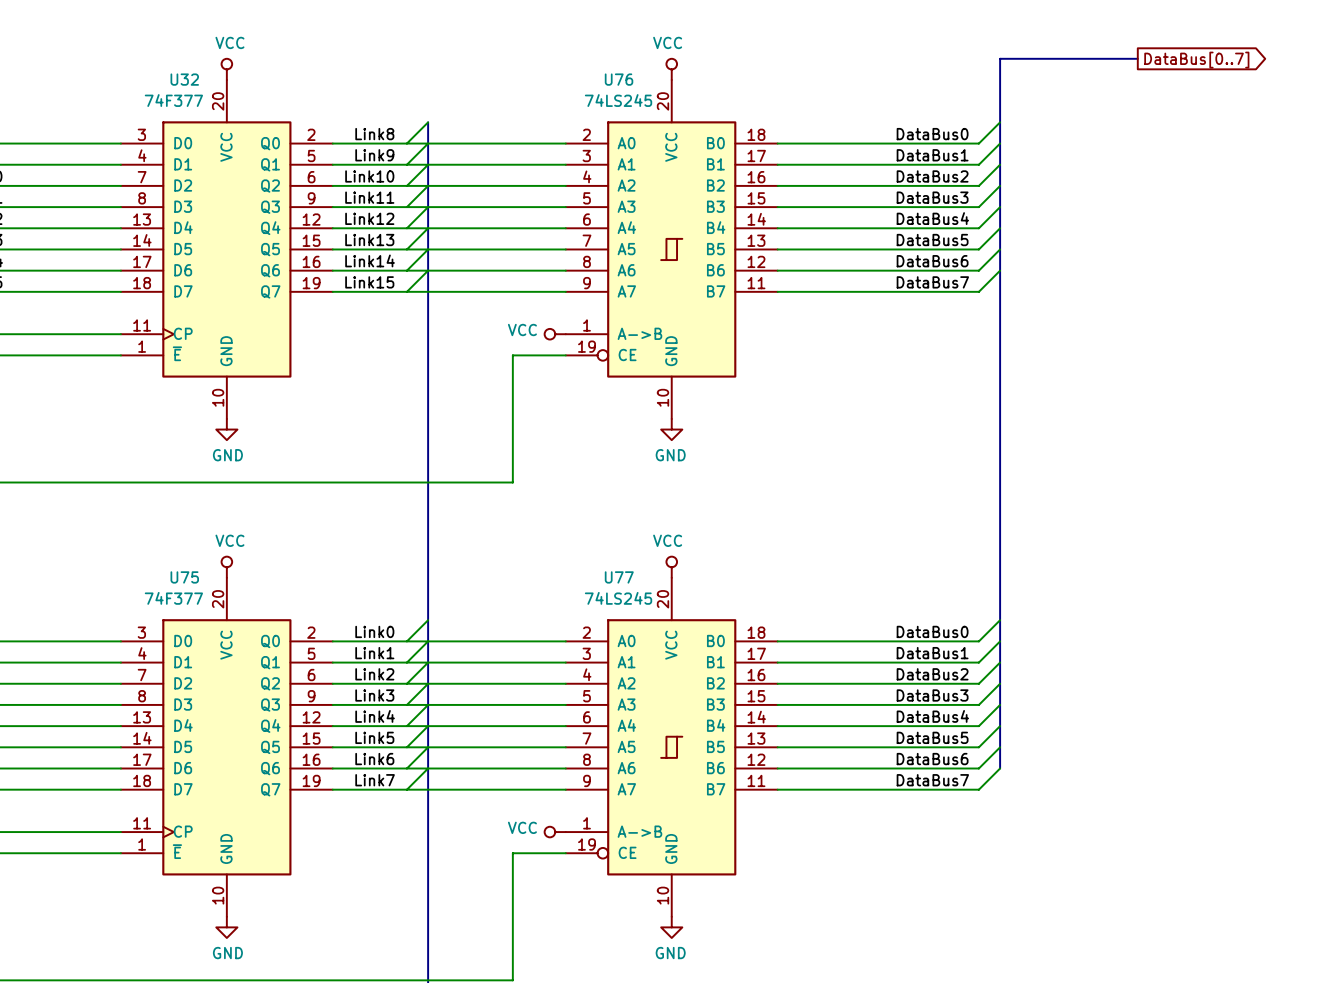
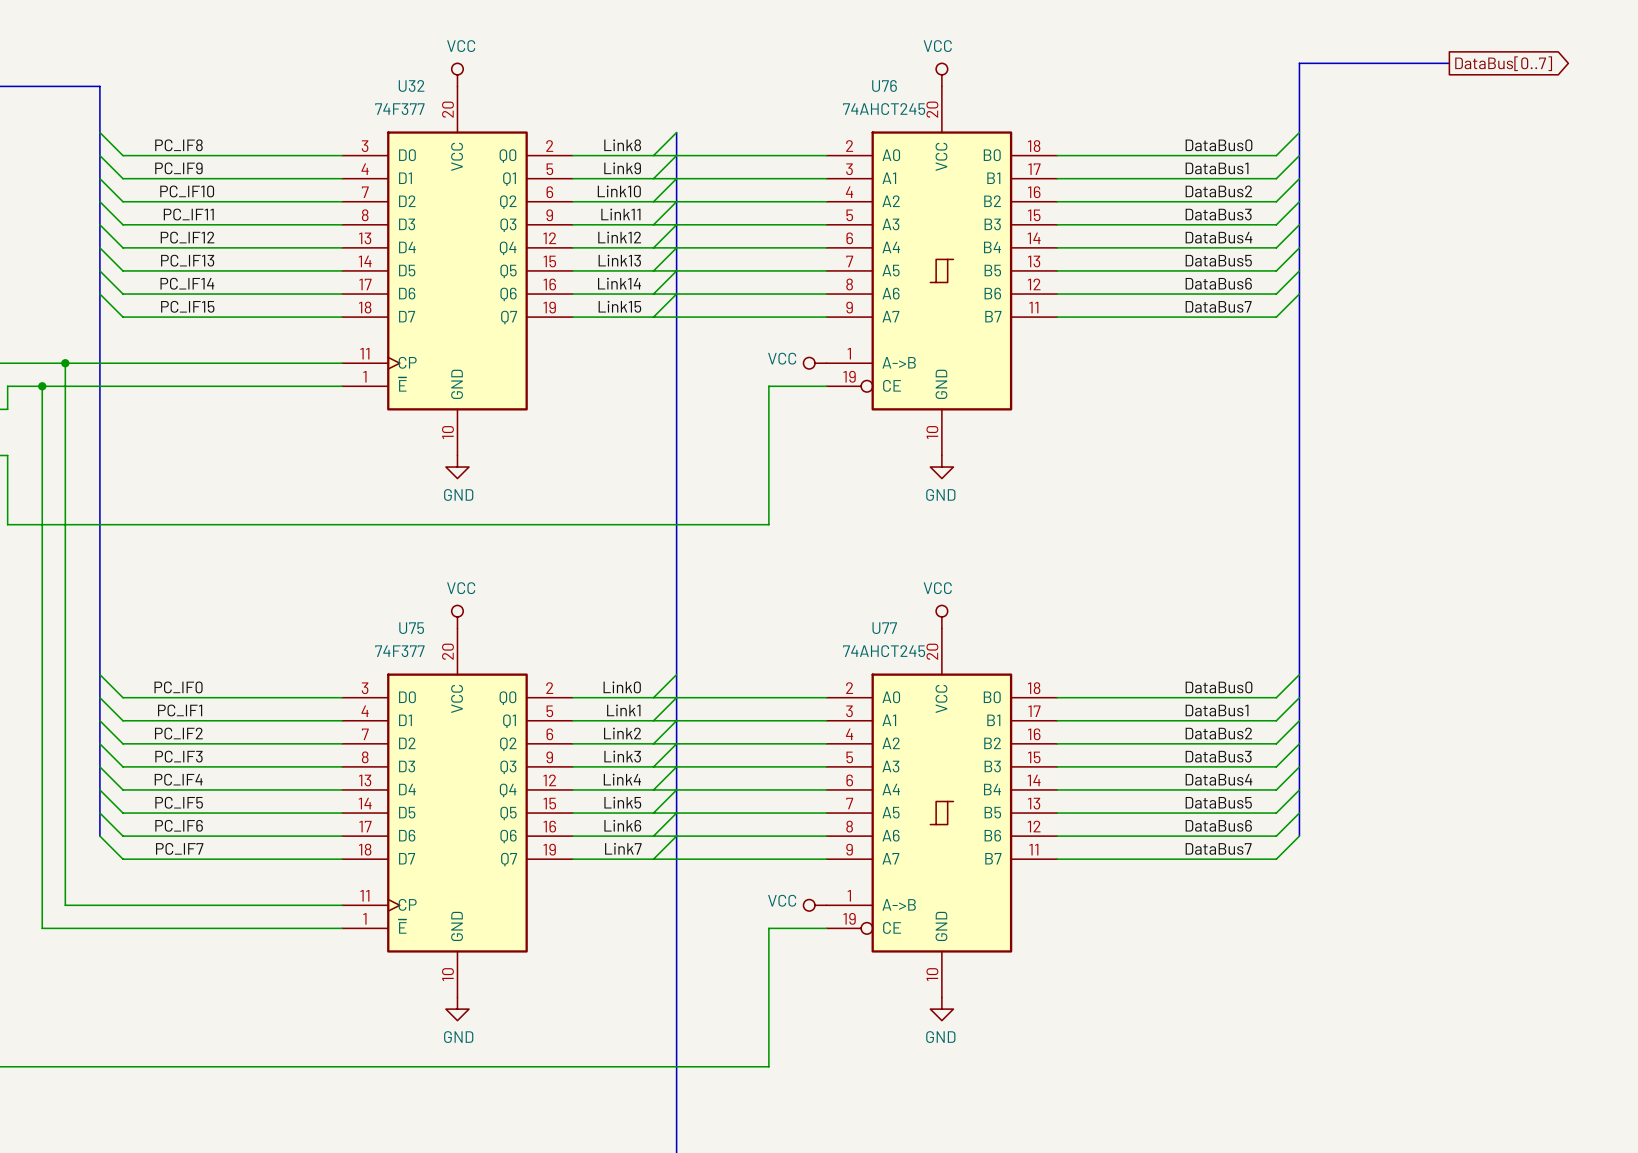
U76 value: 74LS245 (618, 100) -> 74AHCT245 (884, 109)
U77 value: 74LS245 (618, 598) -> 74AHCT245 (884, 651)

